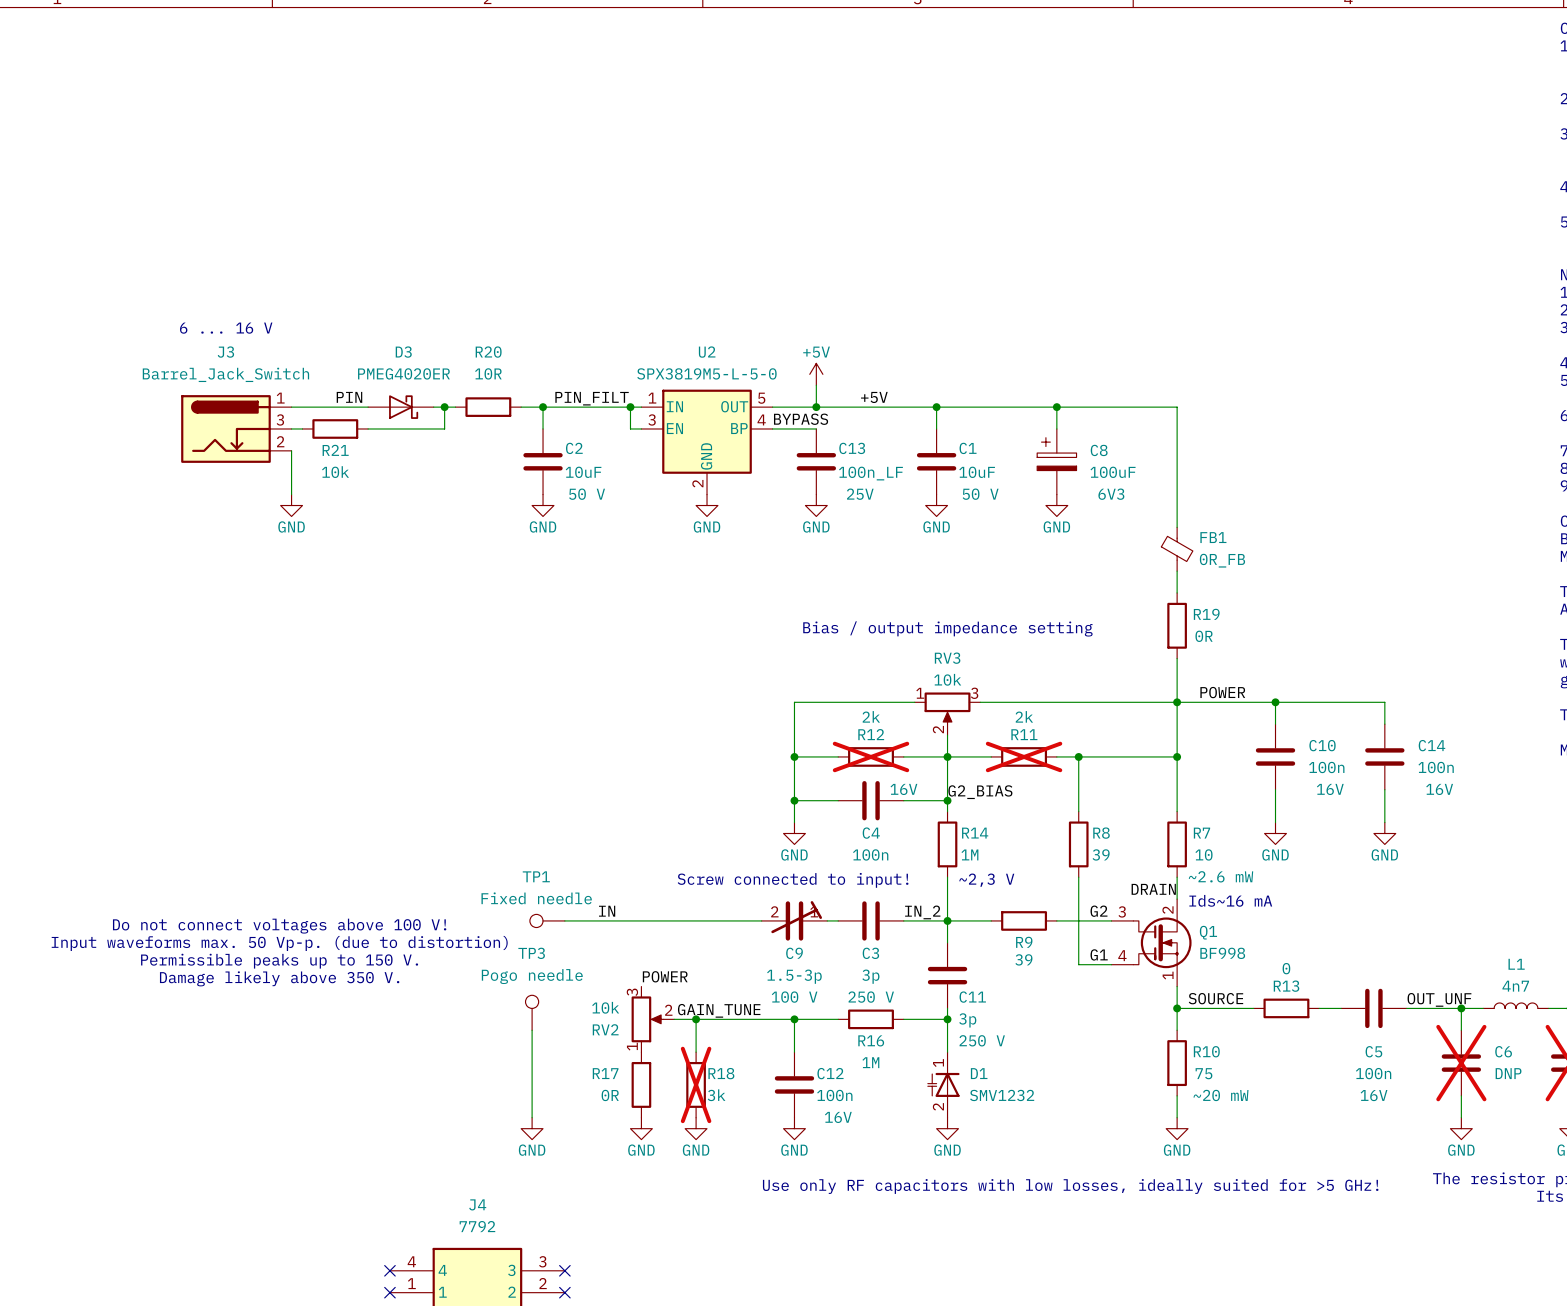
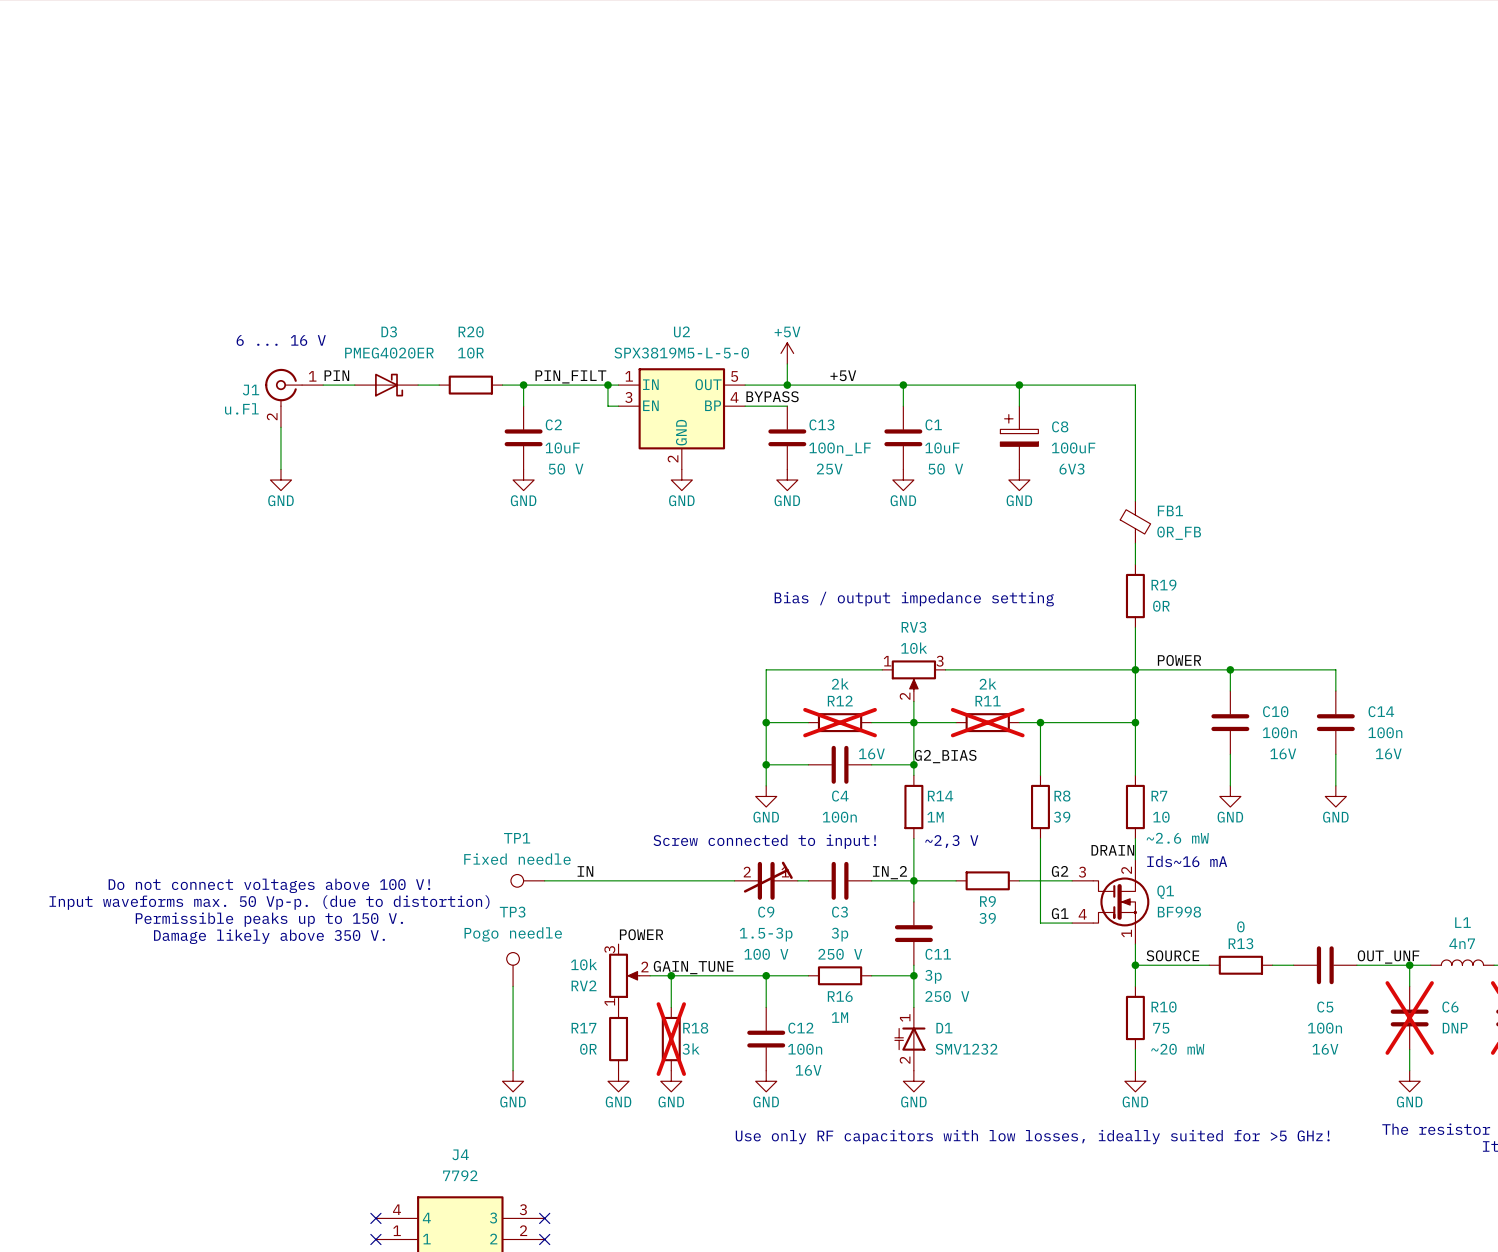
text position: 6 ... 16 V (226, 328) -> 6 ... 16 V (281, 340)
wire: (444, 407) (444, 428) (368, 428) -> none
junction: (444, 407) -> none
J1: none -> u.Fl (294, 398)
J3: Barrel_Jack_Switch (236, 428) -> none
wire: (291, 428) (302, 428) -> none
R21: 10k (335, 428) -> none

